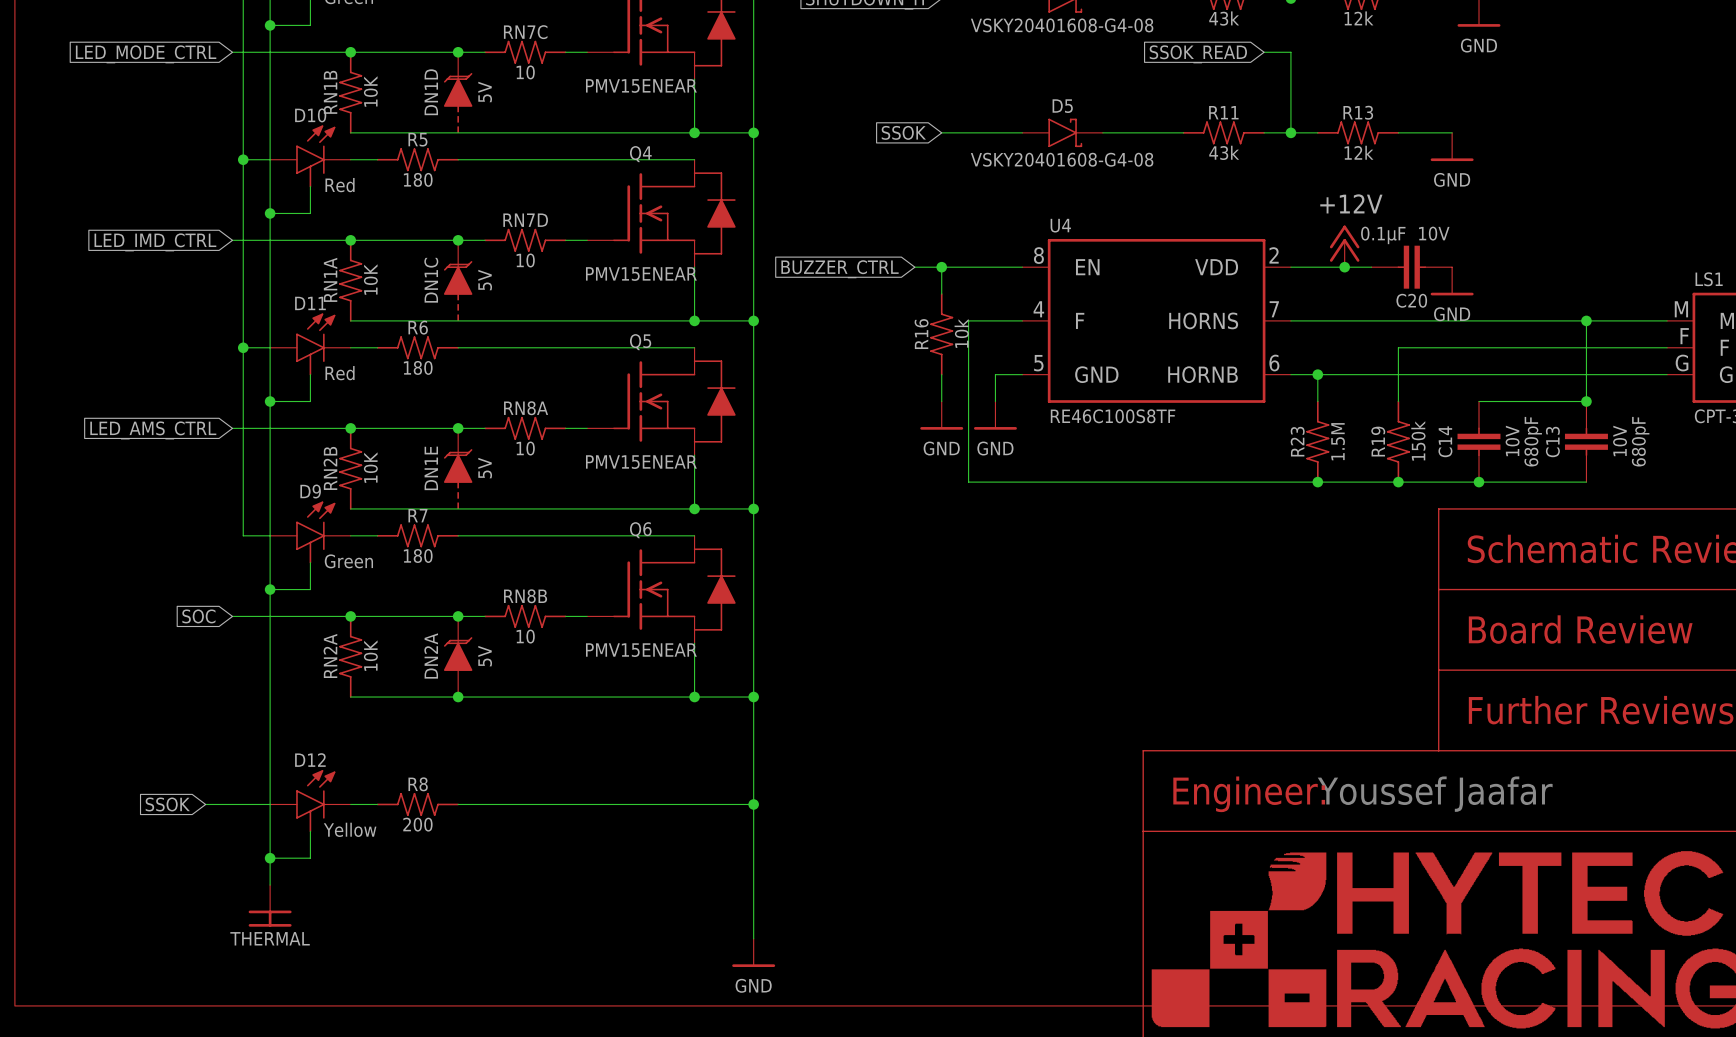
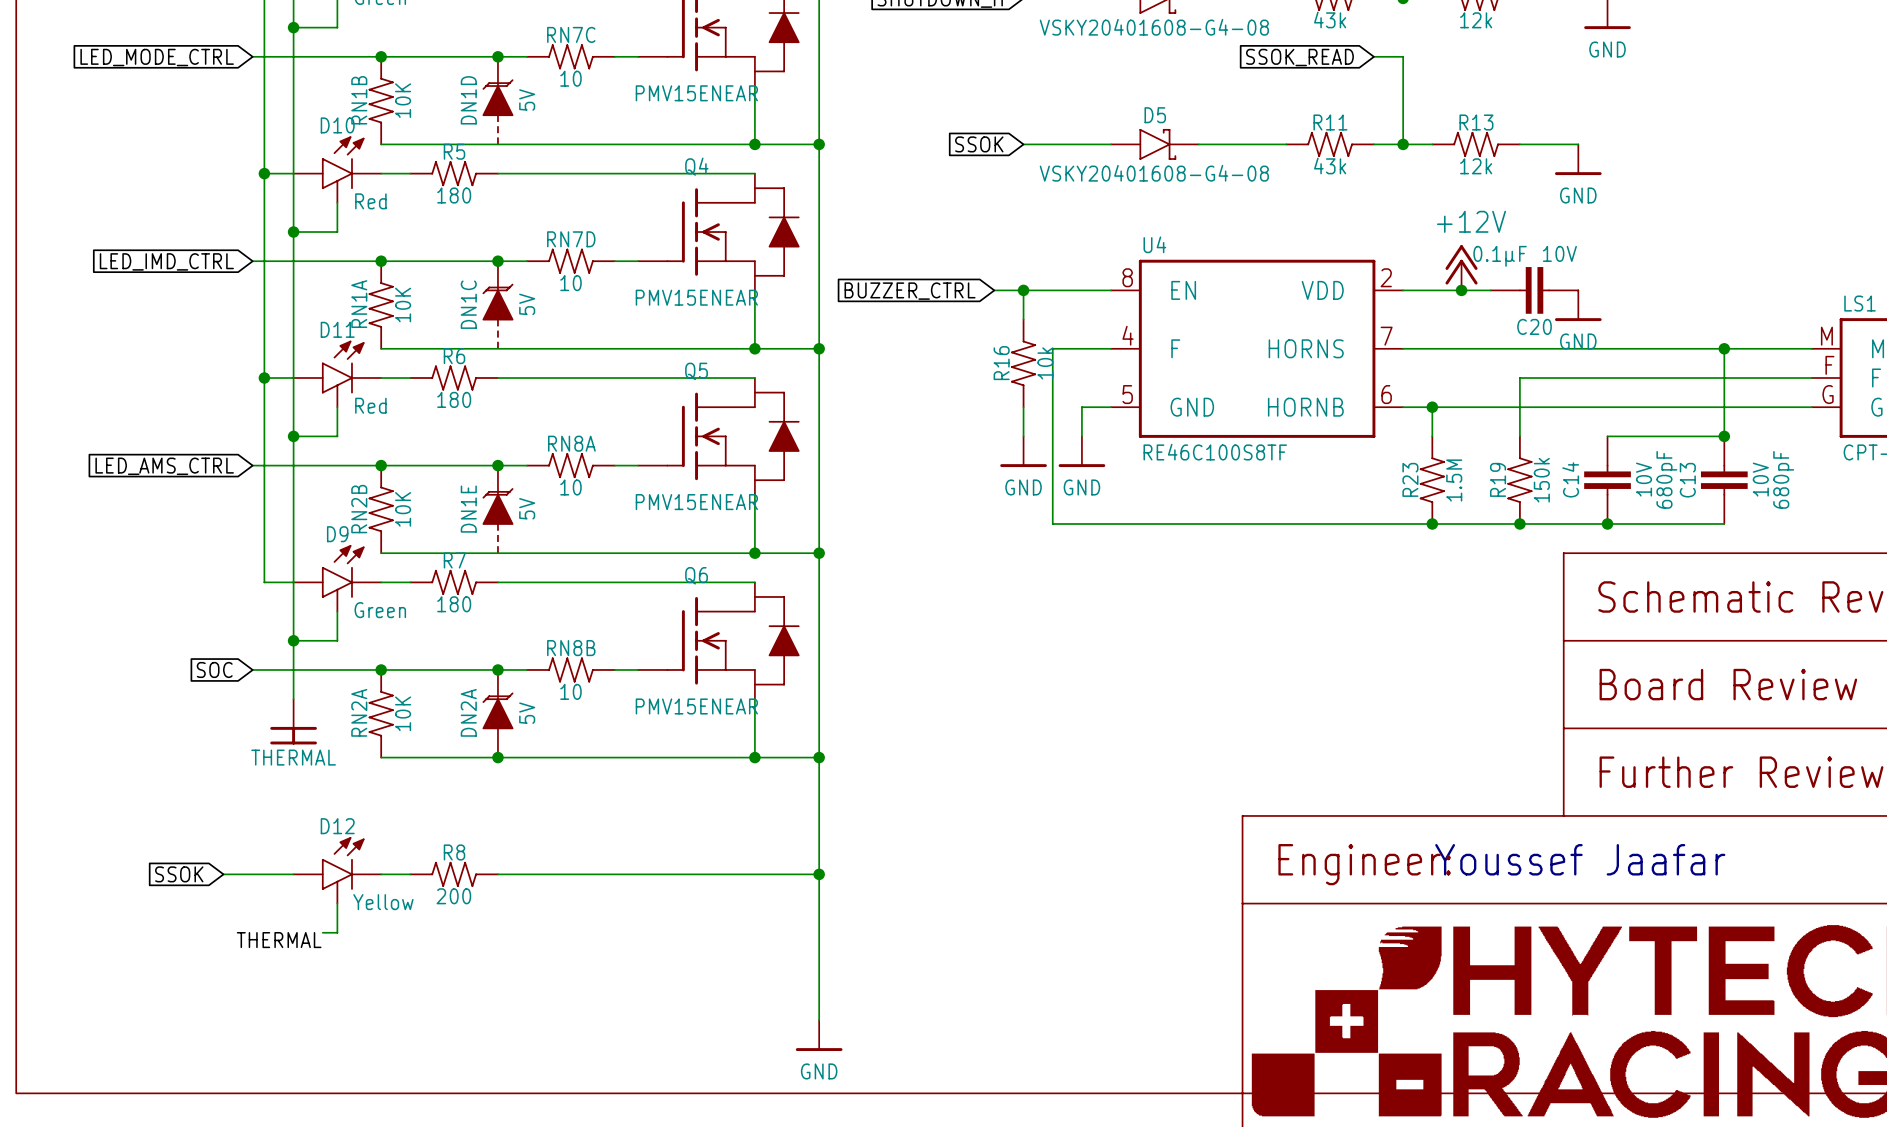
wire: (270, 643) (270, 885) -> none
wire: (270, 858) (296, 858) -> none
junction: (270, 858) -> none
label: none -> THERMAL (279, 940)
power symbol position: THERMAL (270, 905) -> THERMAL (293, 721)

